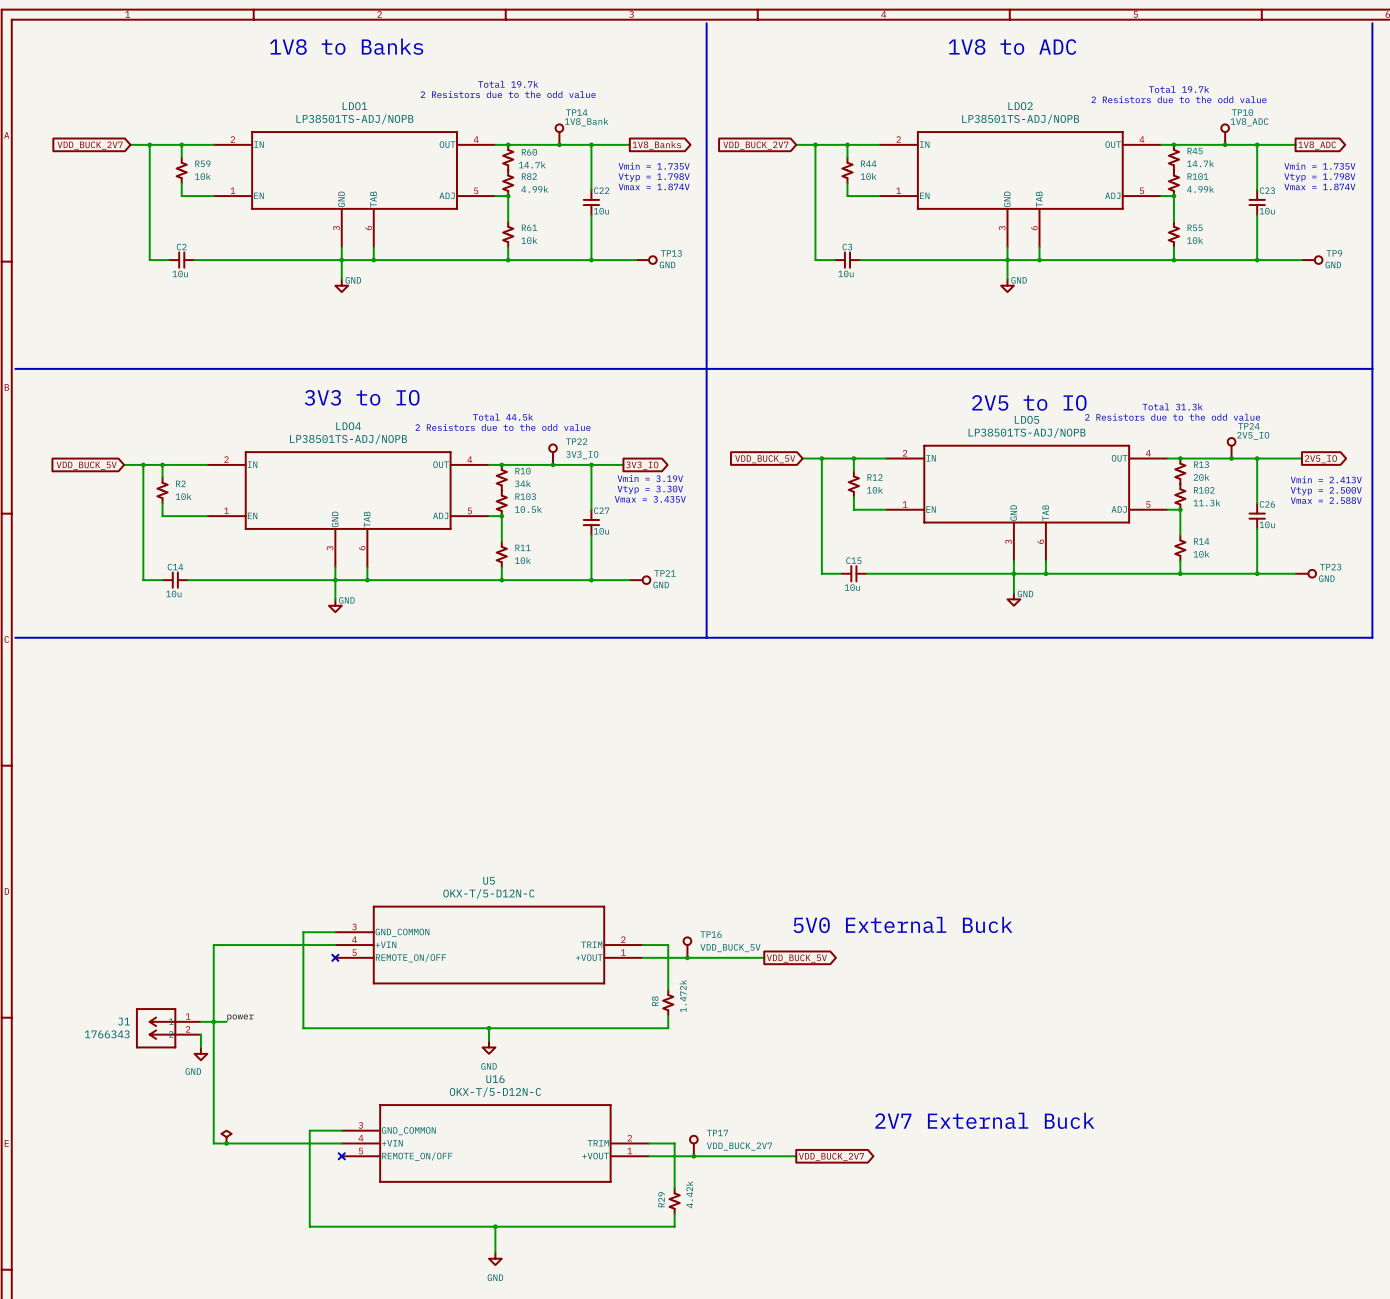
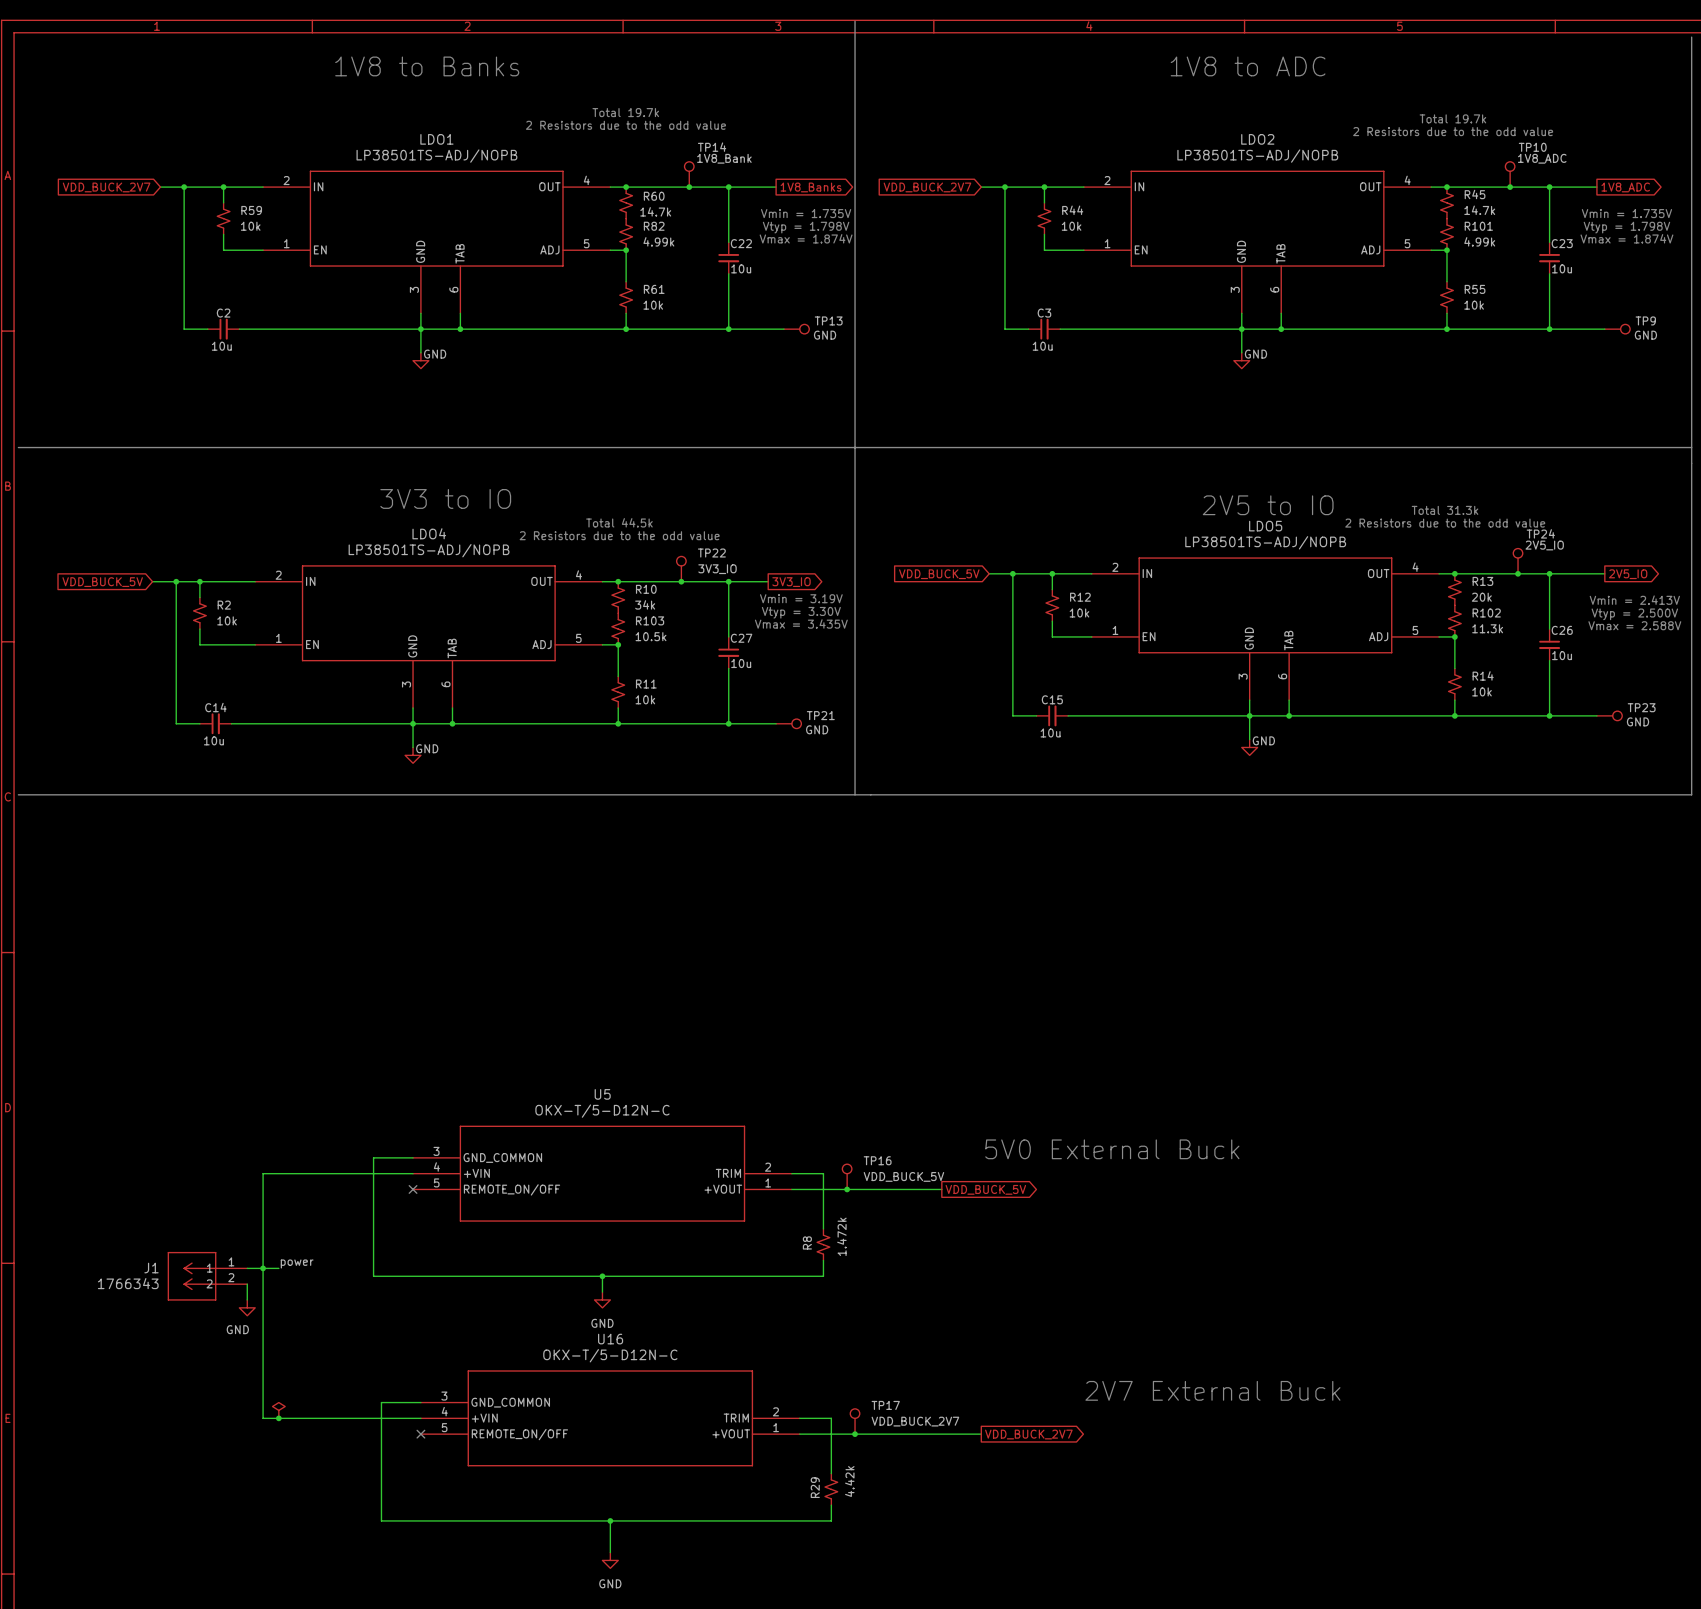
line: none -> (855, 21) (855, 794)
line: (706, 23) (706, 637) -> none
line: (15, 368) (1372, 368) -> (18, 447) (1691, 447)

